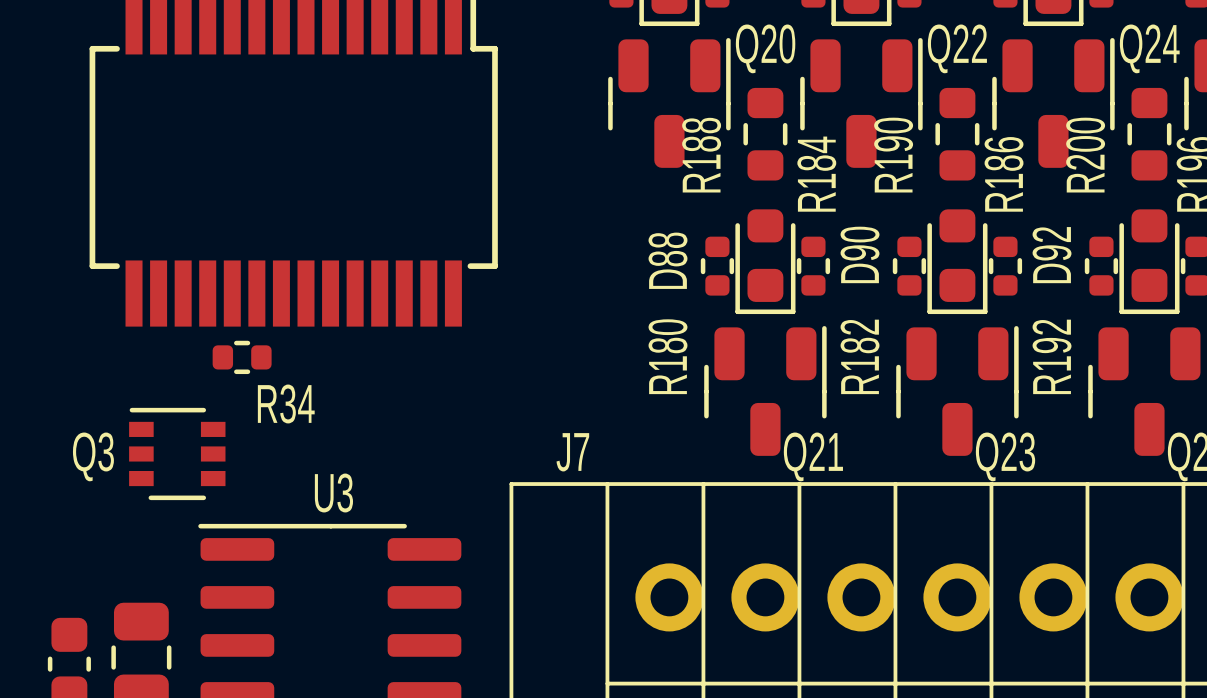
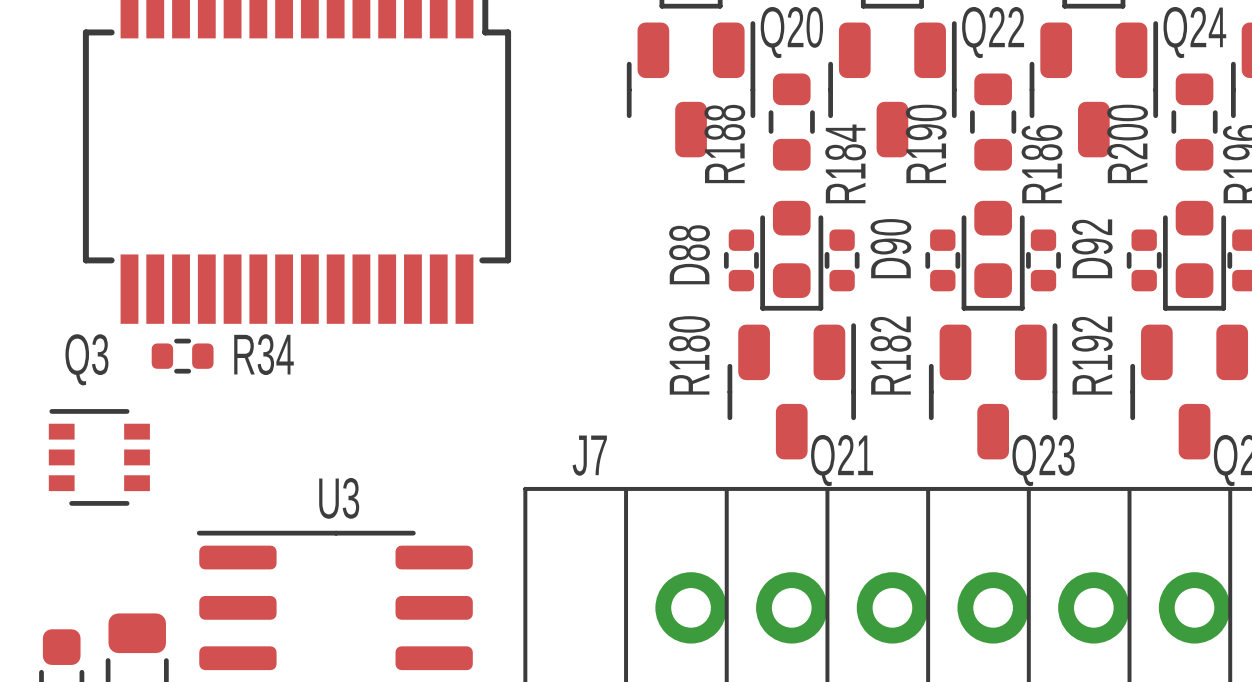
R34 position: (242, 357) -> (182, 356)
R34 name position: R34 (286, 403) -> R34 (264, 354)
Q3 position: (177, 453) -> (99, 457)
Q3 name position: Q3 (93, 456) -> Q3 (86, 359)

